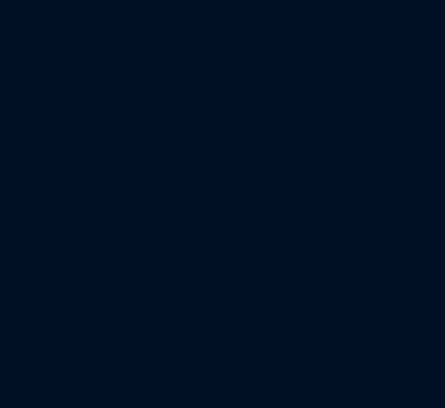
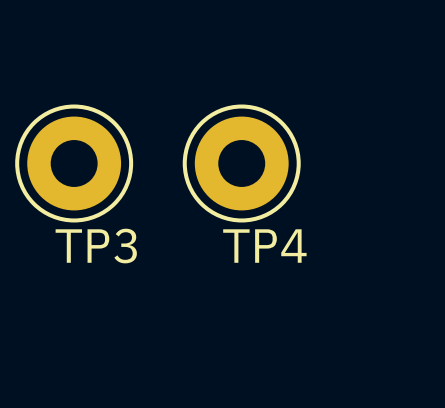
TP3: none -> (74, 163)
TP4: none -> (241, 163)

